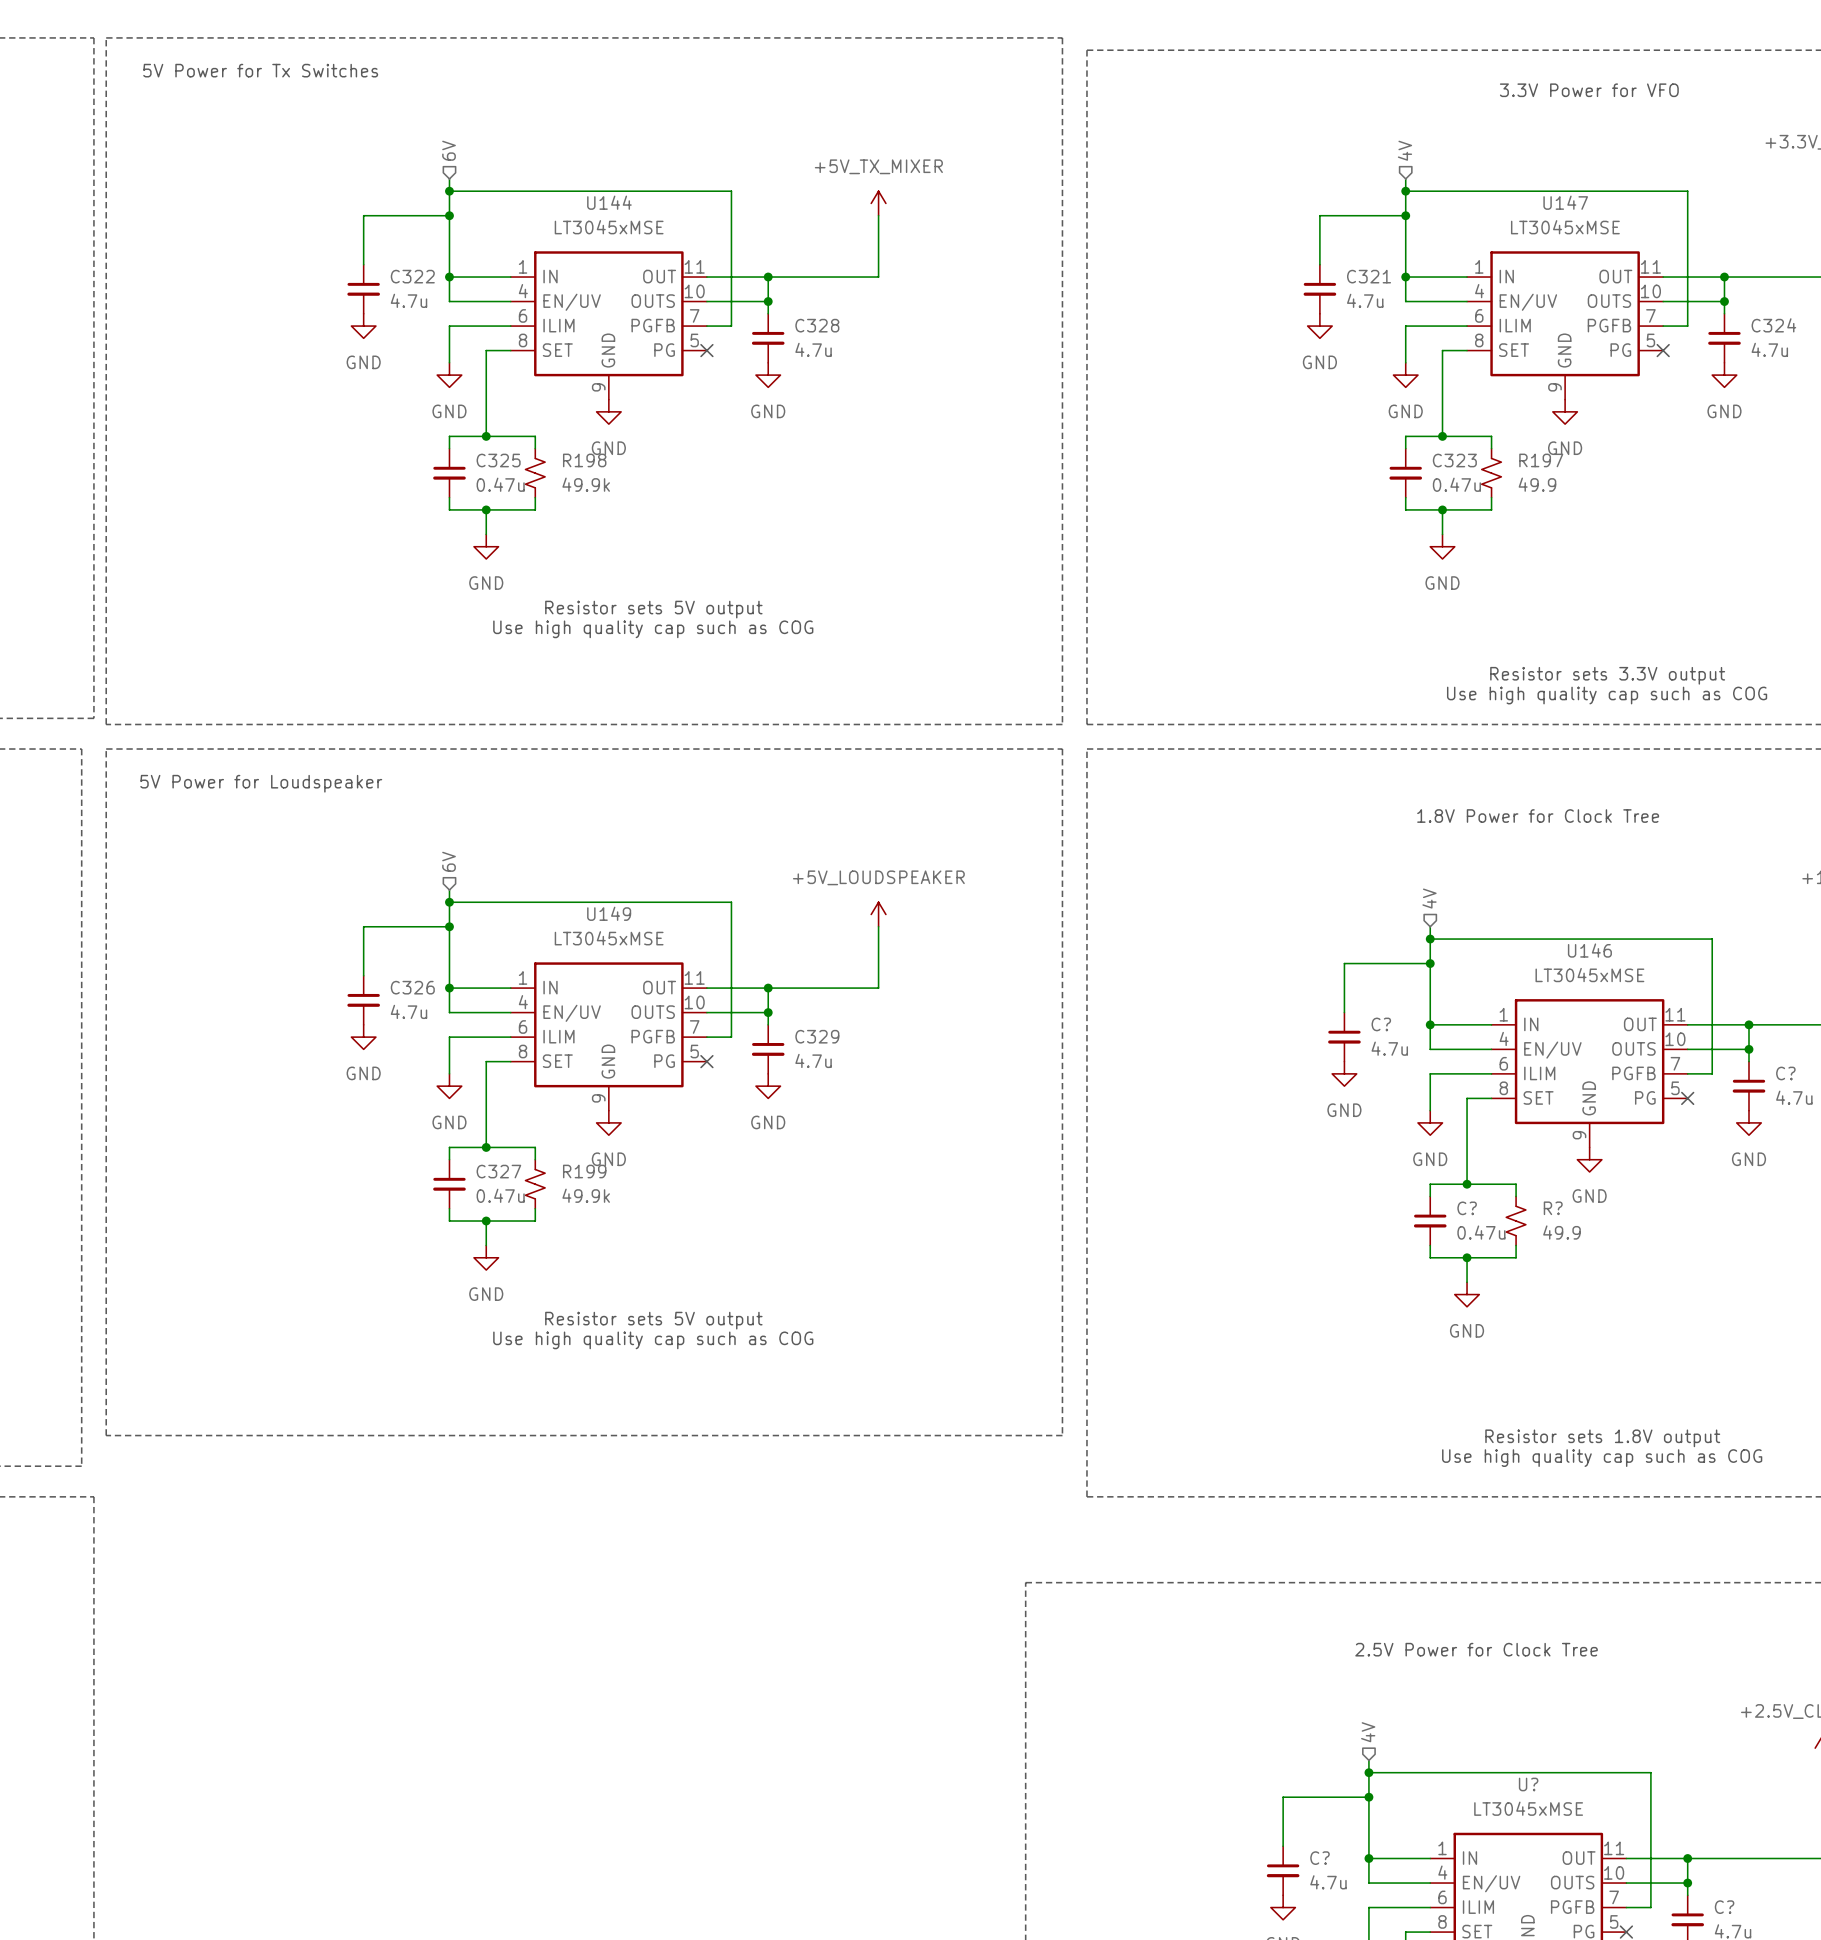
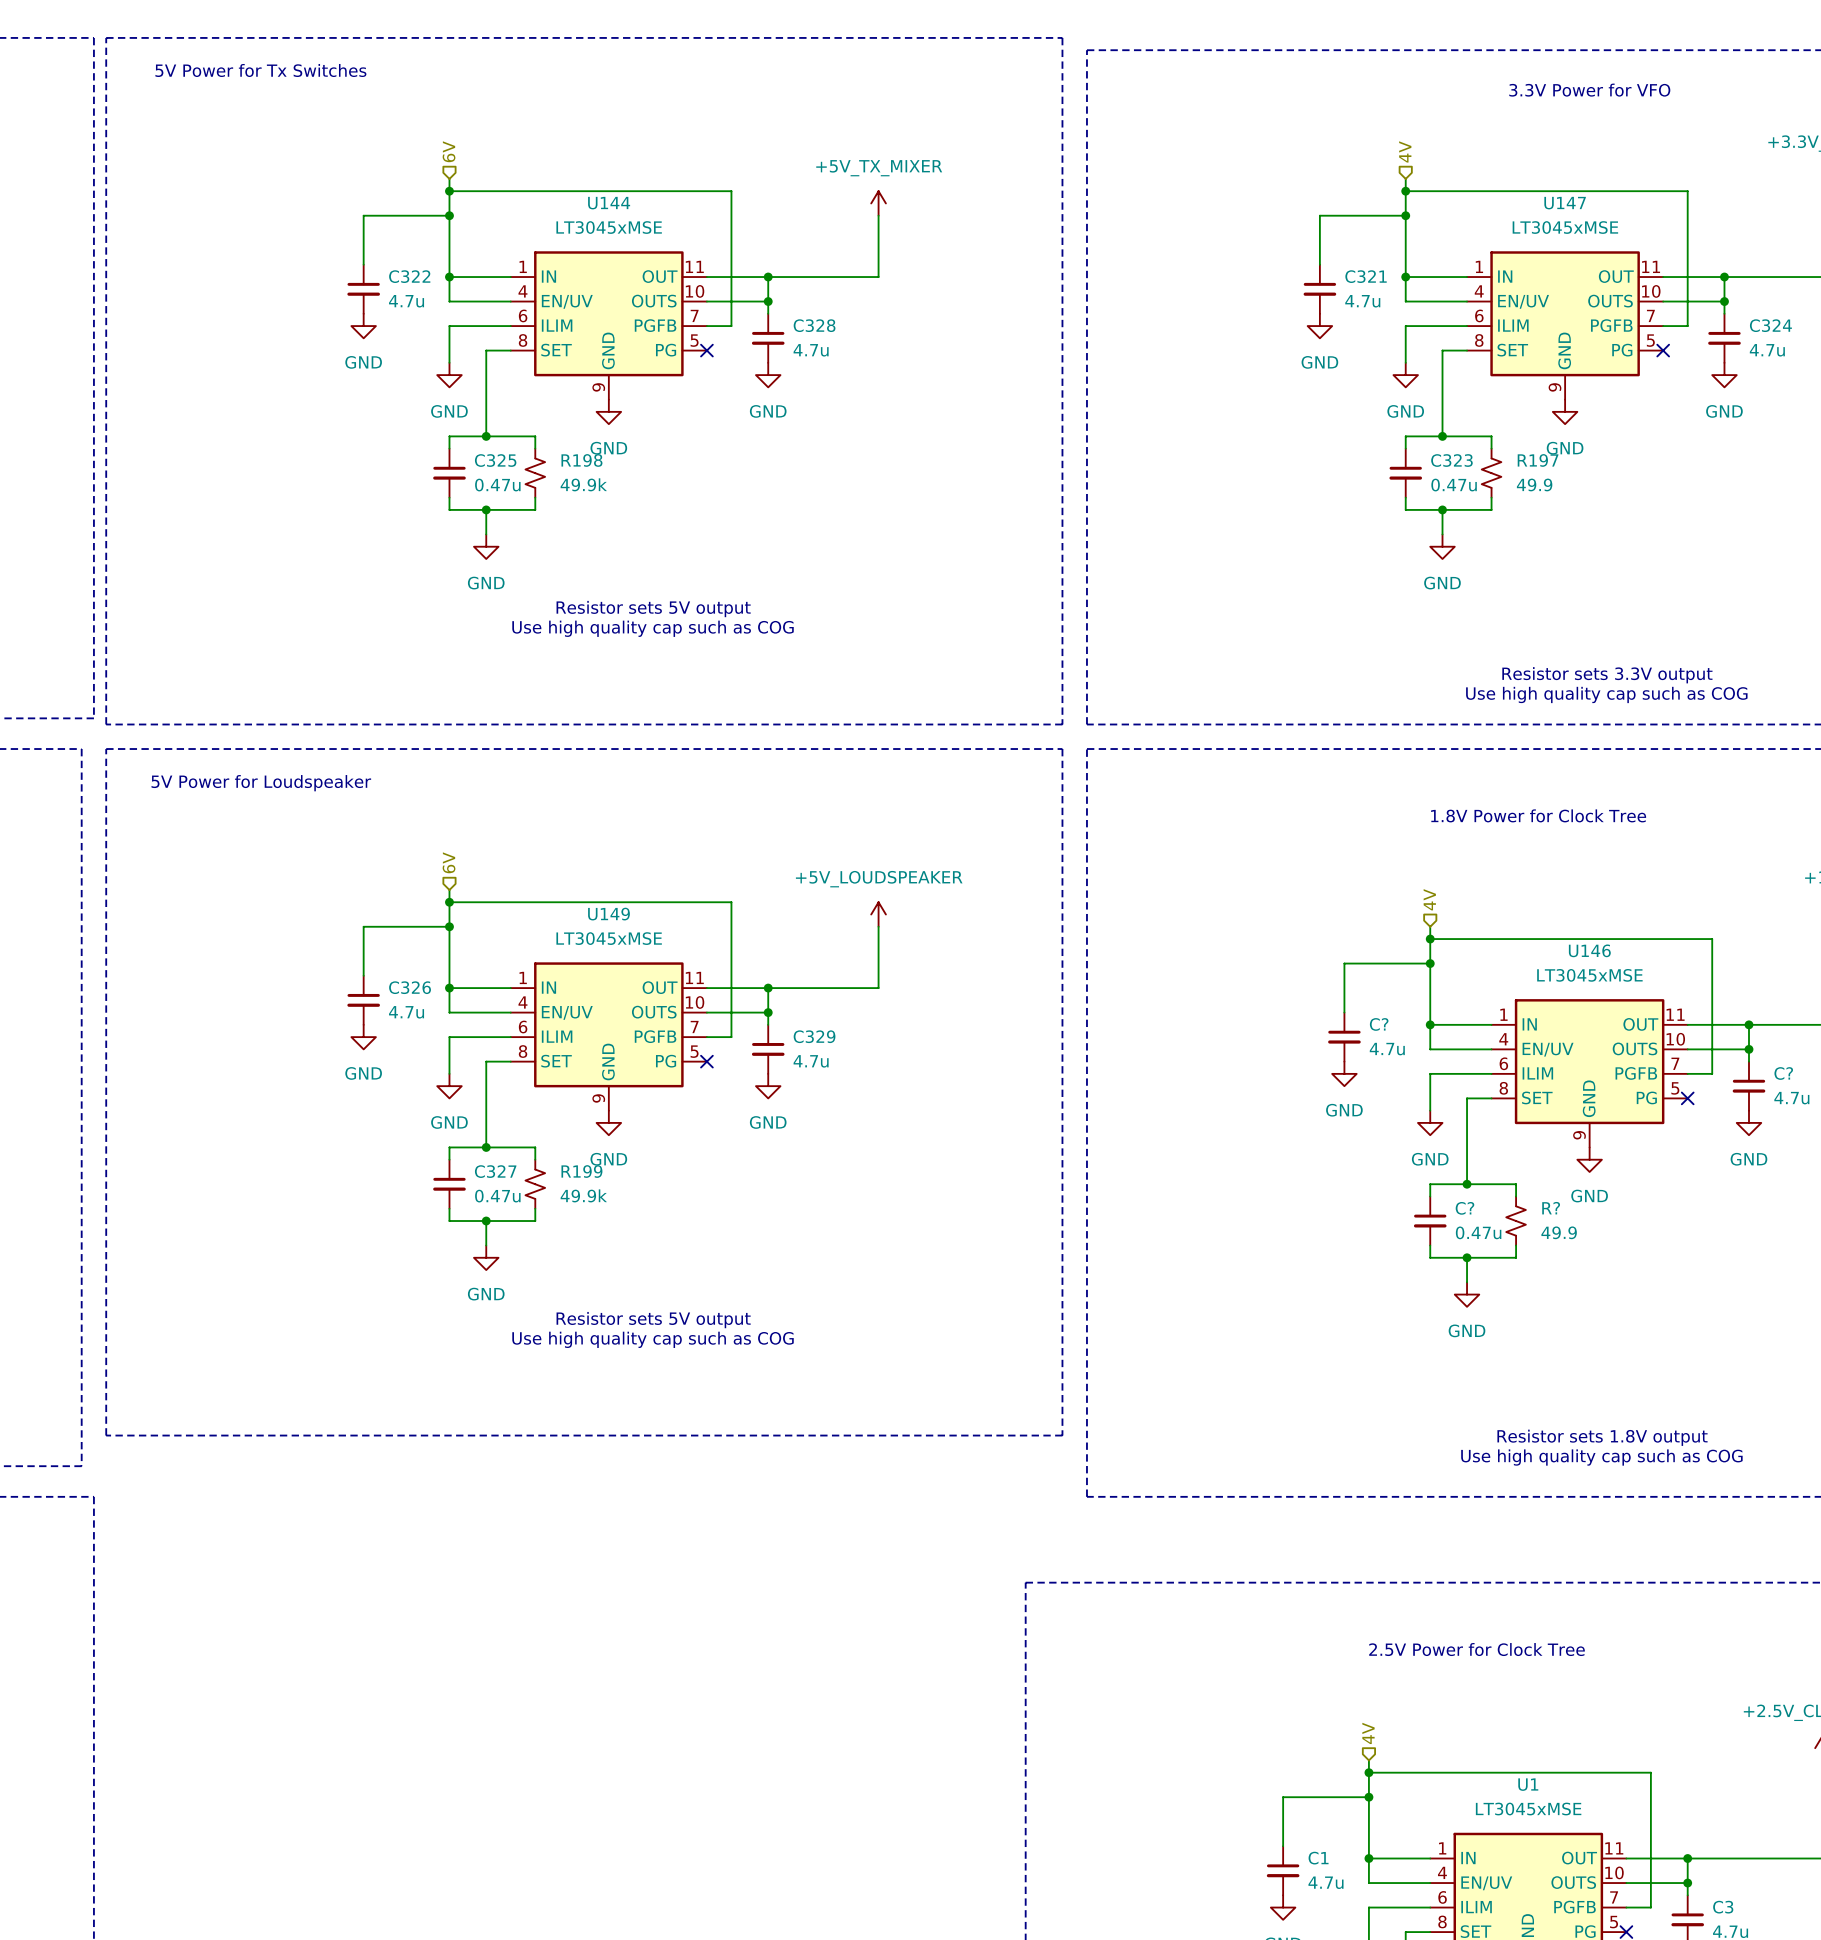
U? name: U? (1528, 1784) -> U1 (1528, 1784)
C? name: C? (1320, 1858) -> C1 (1318, 1858)
C? name: C? (1724, 1907) -> C3 (1723, 1907)

